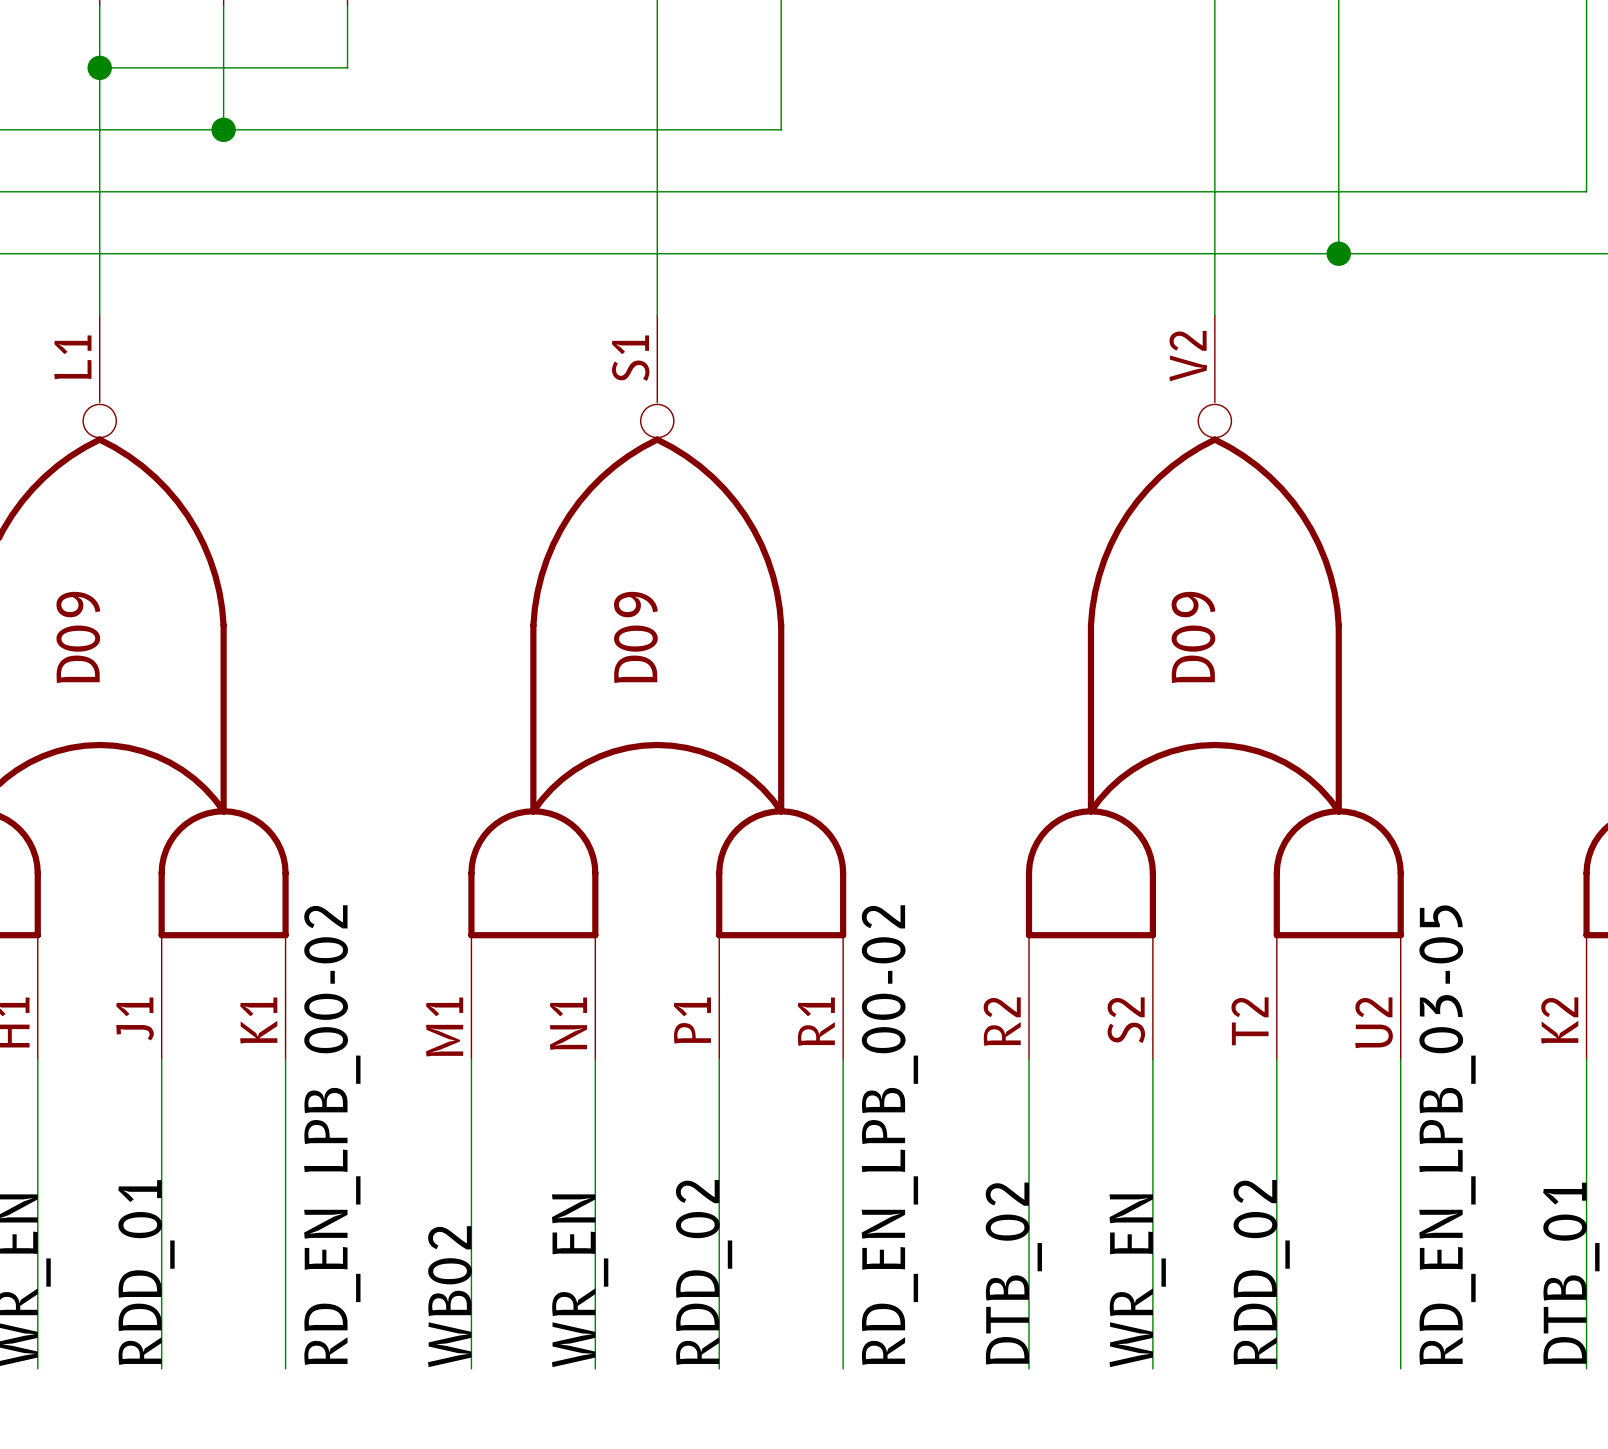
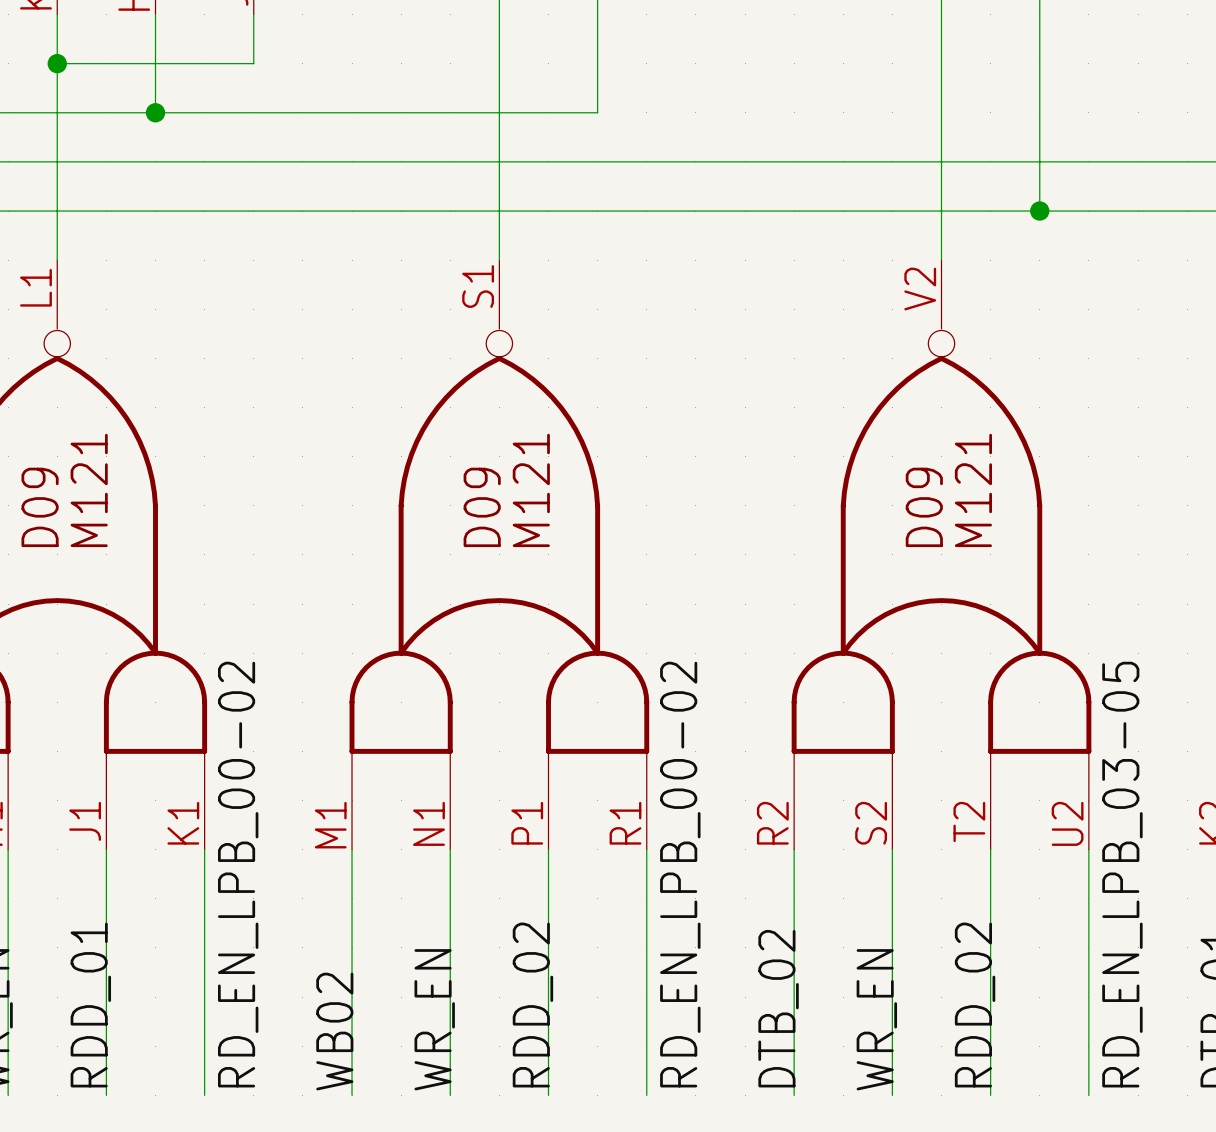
D09 value: none -> M121 (89, 490)
D09 value: none -> M121 (531, 490)
D09 value: none -> M121 (973, 490)

